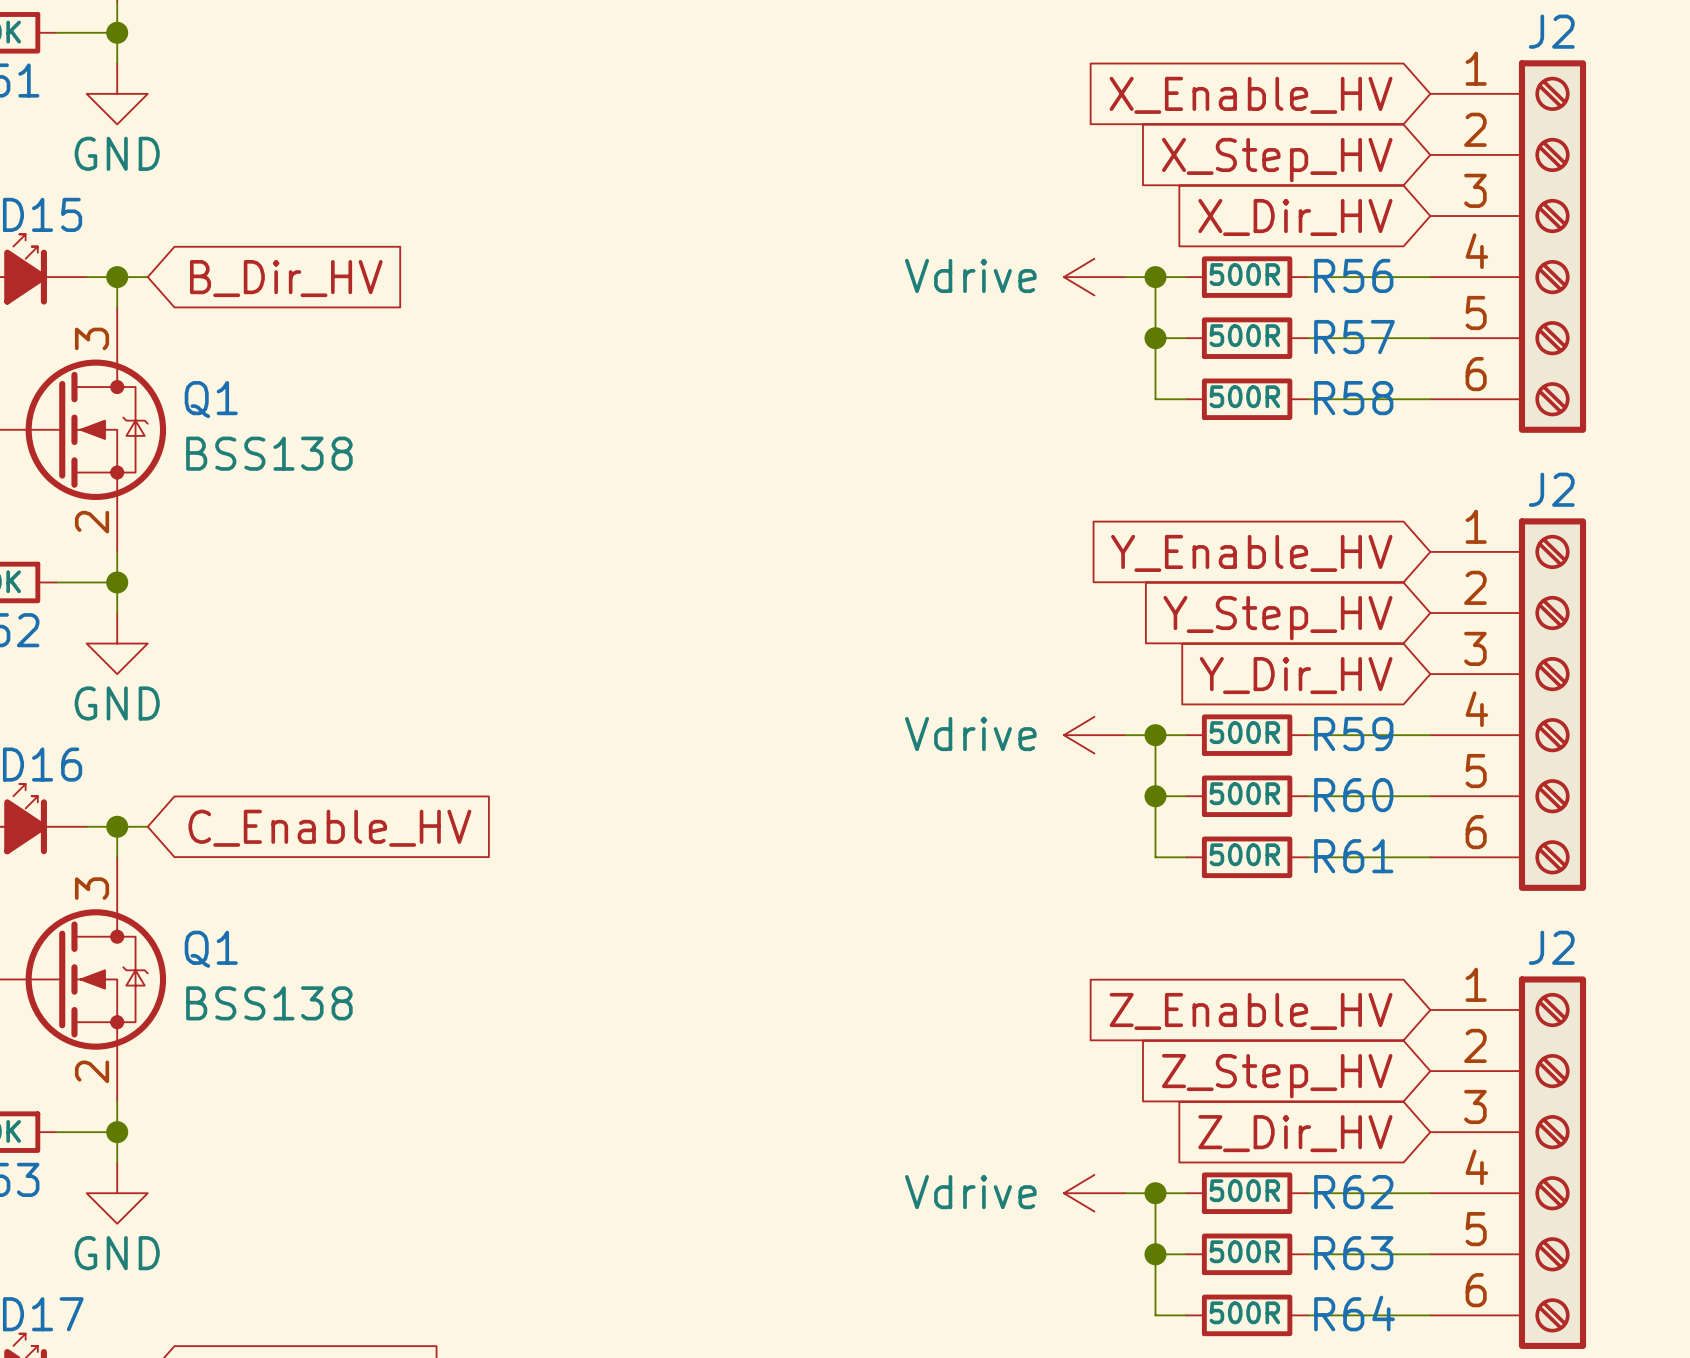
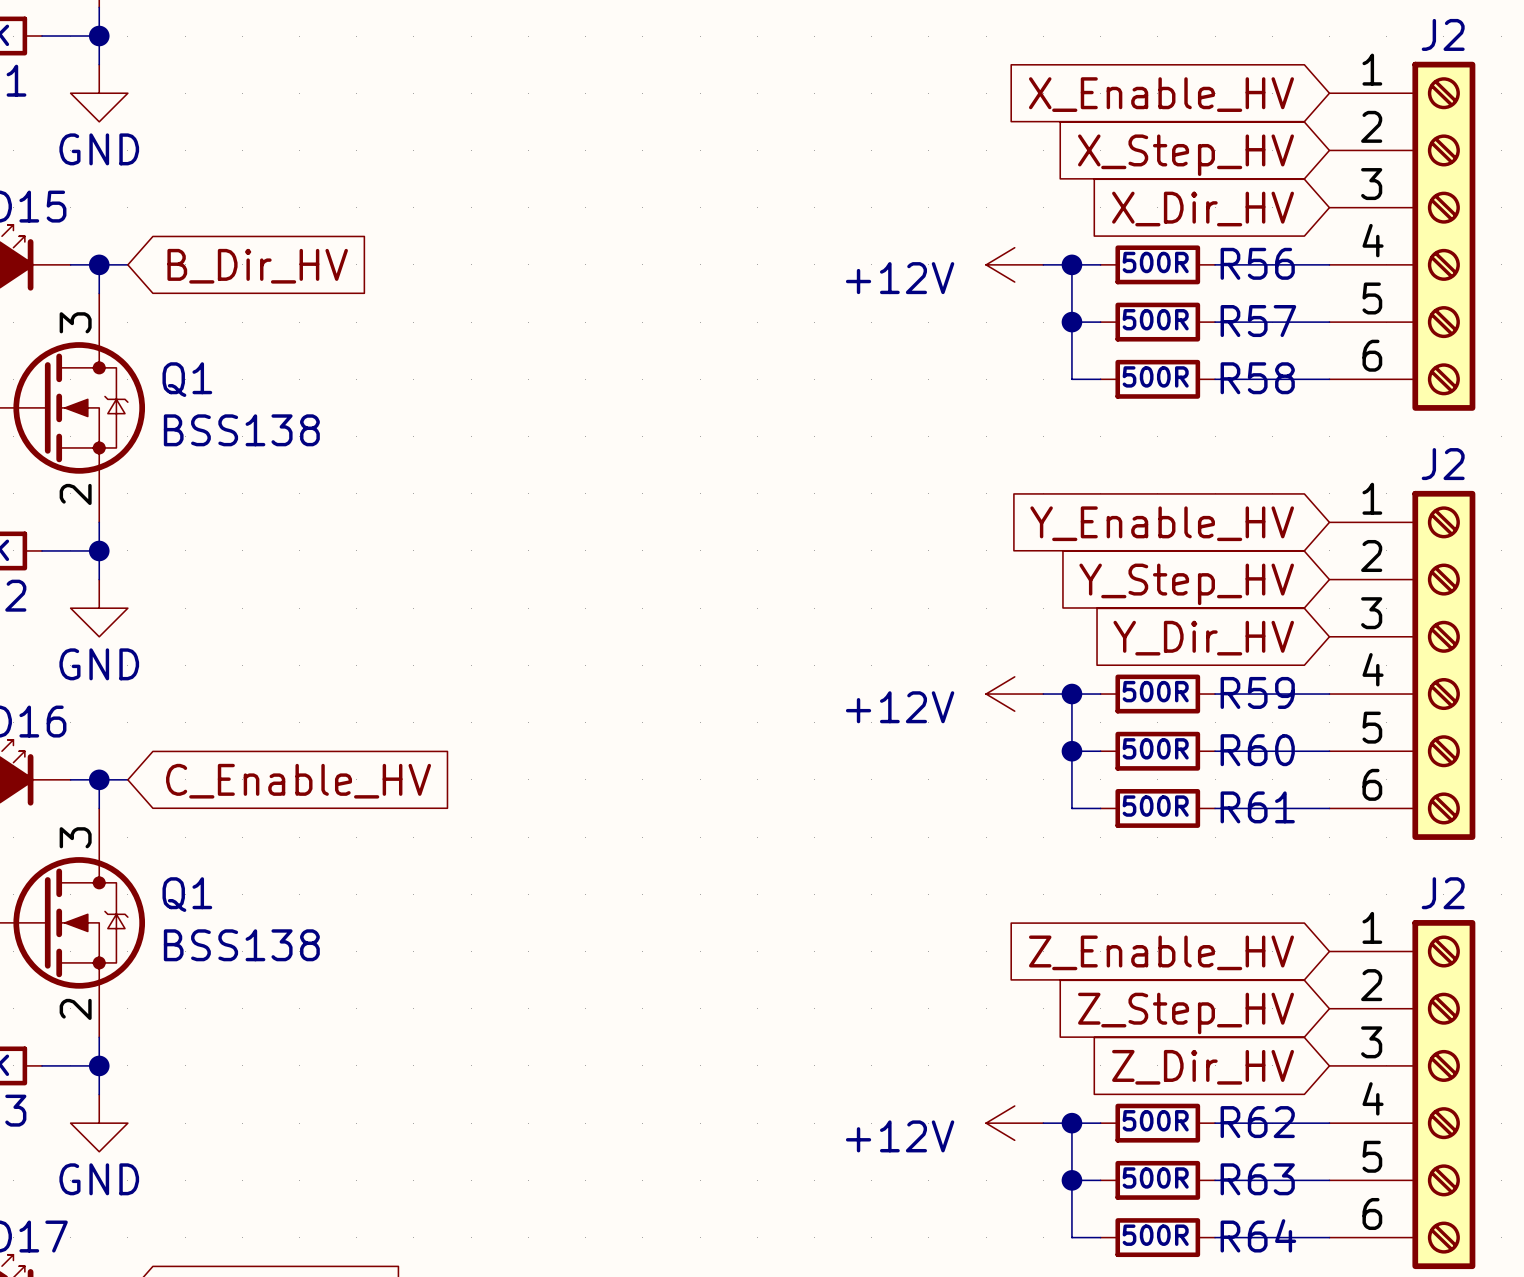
power symbol: Vdrive (1094, 277) -> +12V (1014, 264)
power symbol: Vdrive (1094, 735) -> +12V (1014, 694)
power symbol: Vdrive (1094, 1193) -> +12V (1014, 1123)

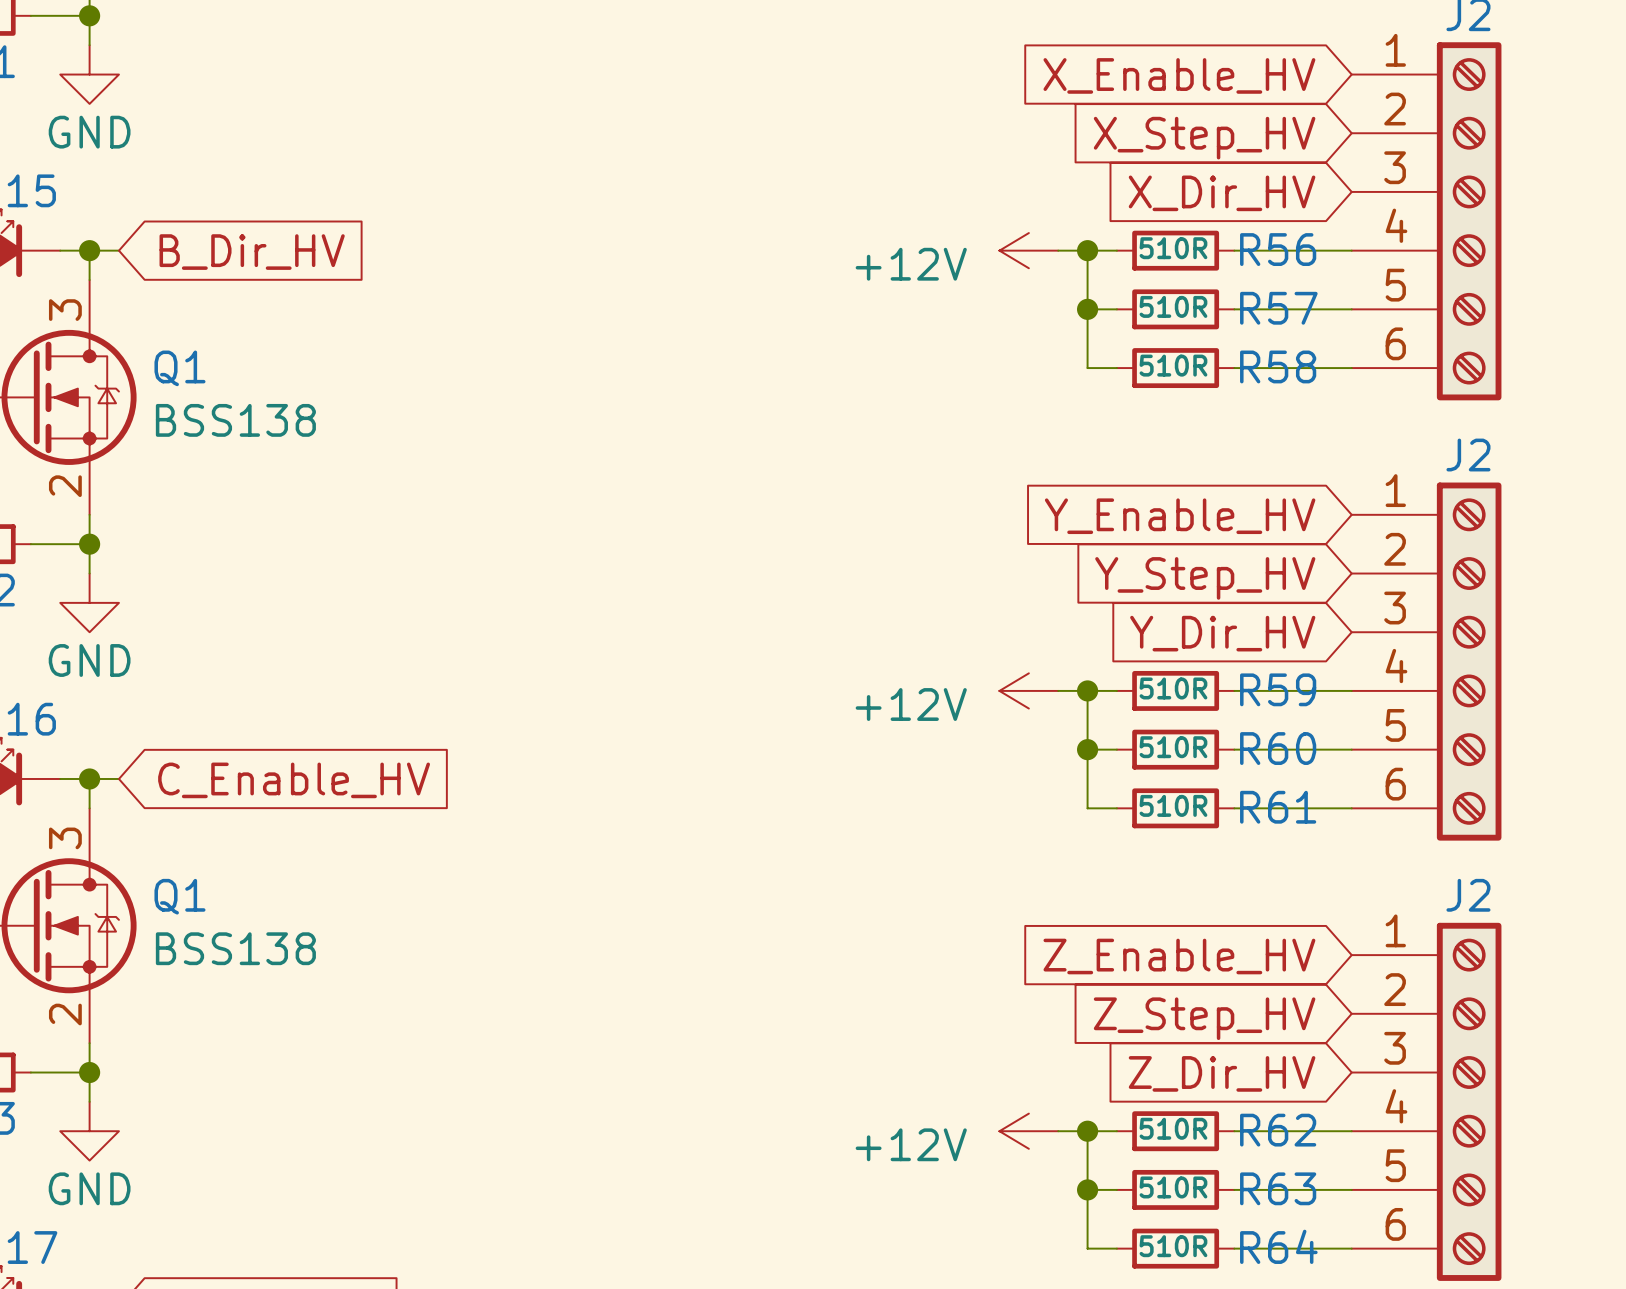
R56 value: 500R (1155, 262) -> 510R (1173, 248)
R57 value: 500R (1155, 319) -> 510R (1173, 306)
R58 value: 500R (1155, 376) -> 510R (1173, 365)
R59 value: 500R (1155, 691) -> 510R (1173, 688)
R60 value: 500R (1155, 748) -> 510R (1173, 747)
R61 value: 500R (1155, 806) -> 510R (1173, 805)
R62 value: 500R (1155, 1120) -> 510R (1173, 1128)
R63 value: 500R (1155, 1177) -> 510R (1173, 1187)
R64 value: 500R (1155, 1235) -> 510R (1173, 1246)

